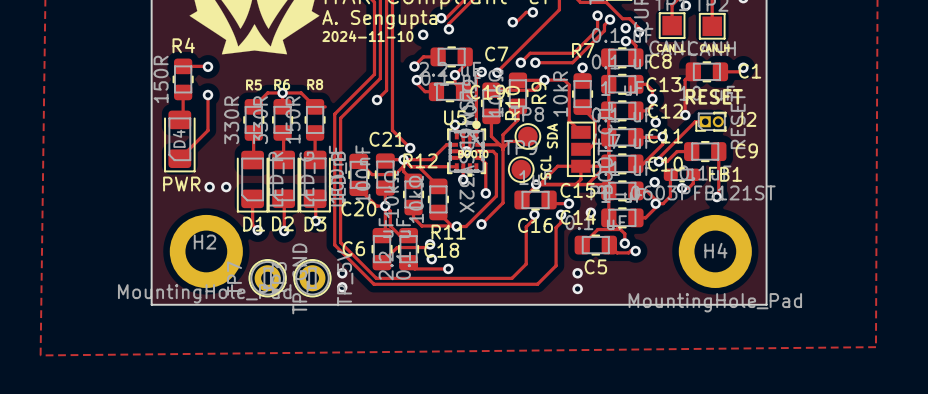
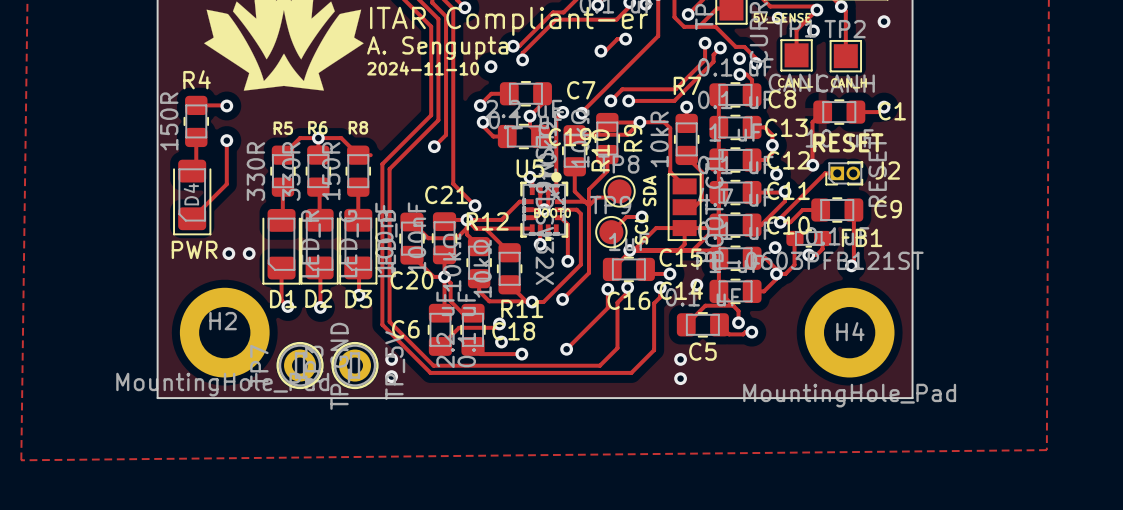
track: none -> (641, 216) (626, 216) (611, 232)
via: none -> (641, 216)
track: none -> (607, 289) (607, 308) (566, 349)
via: none -> (607, 289)
via: none -> (566, 349)

